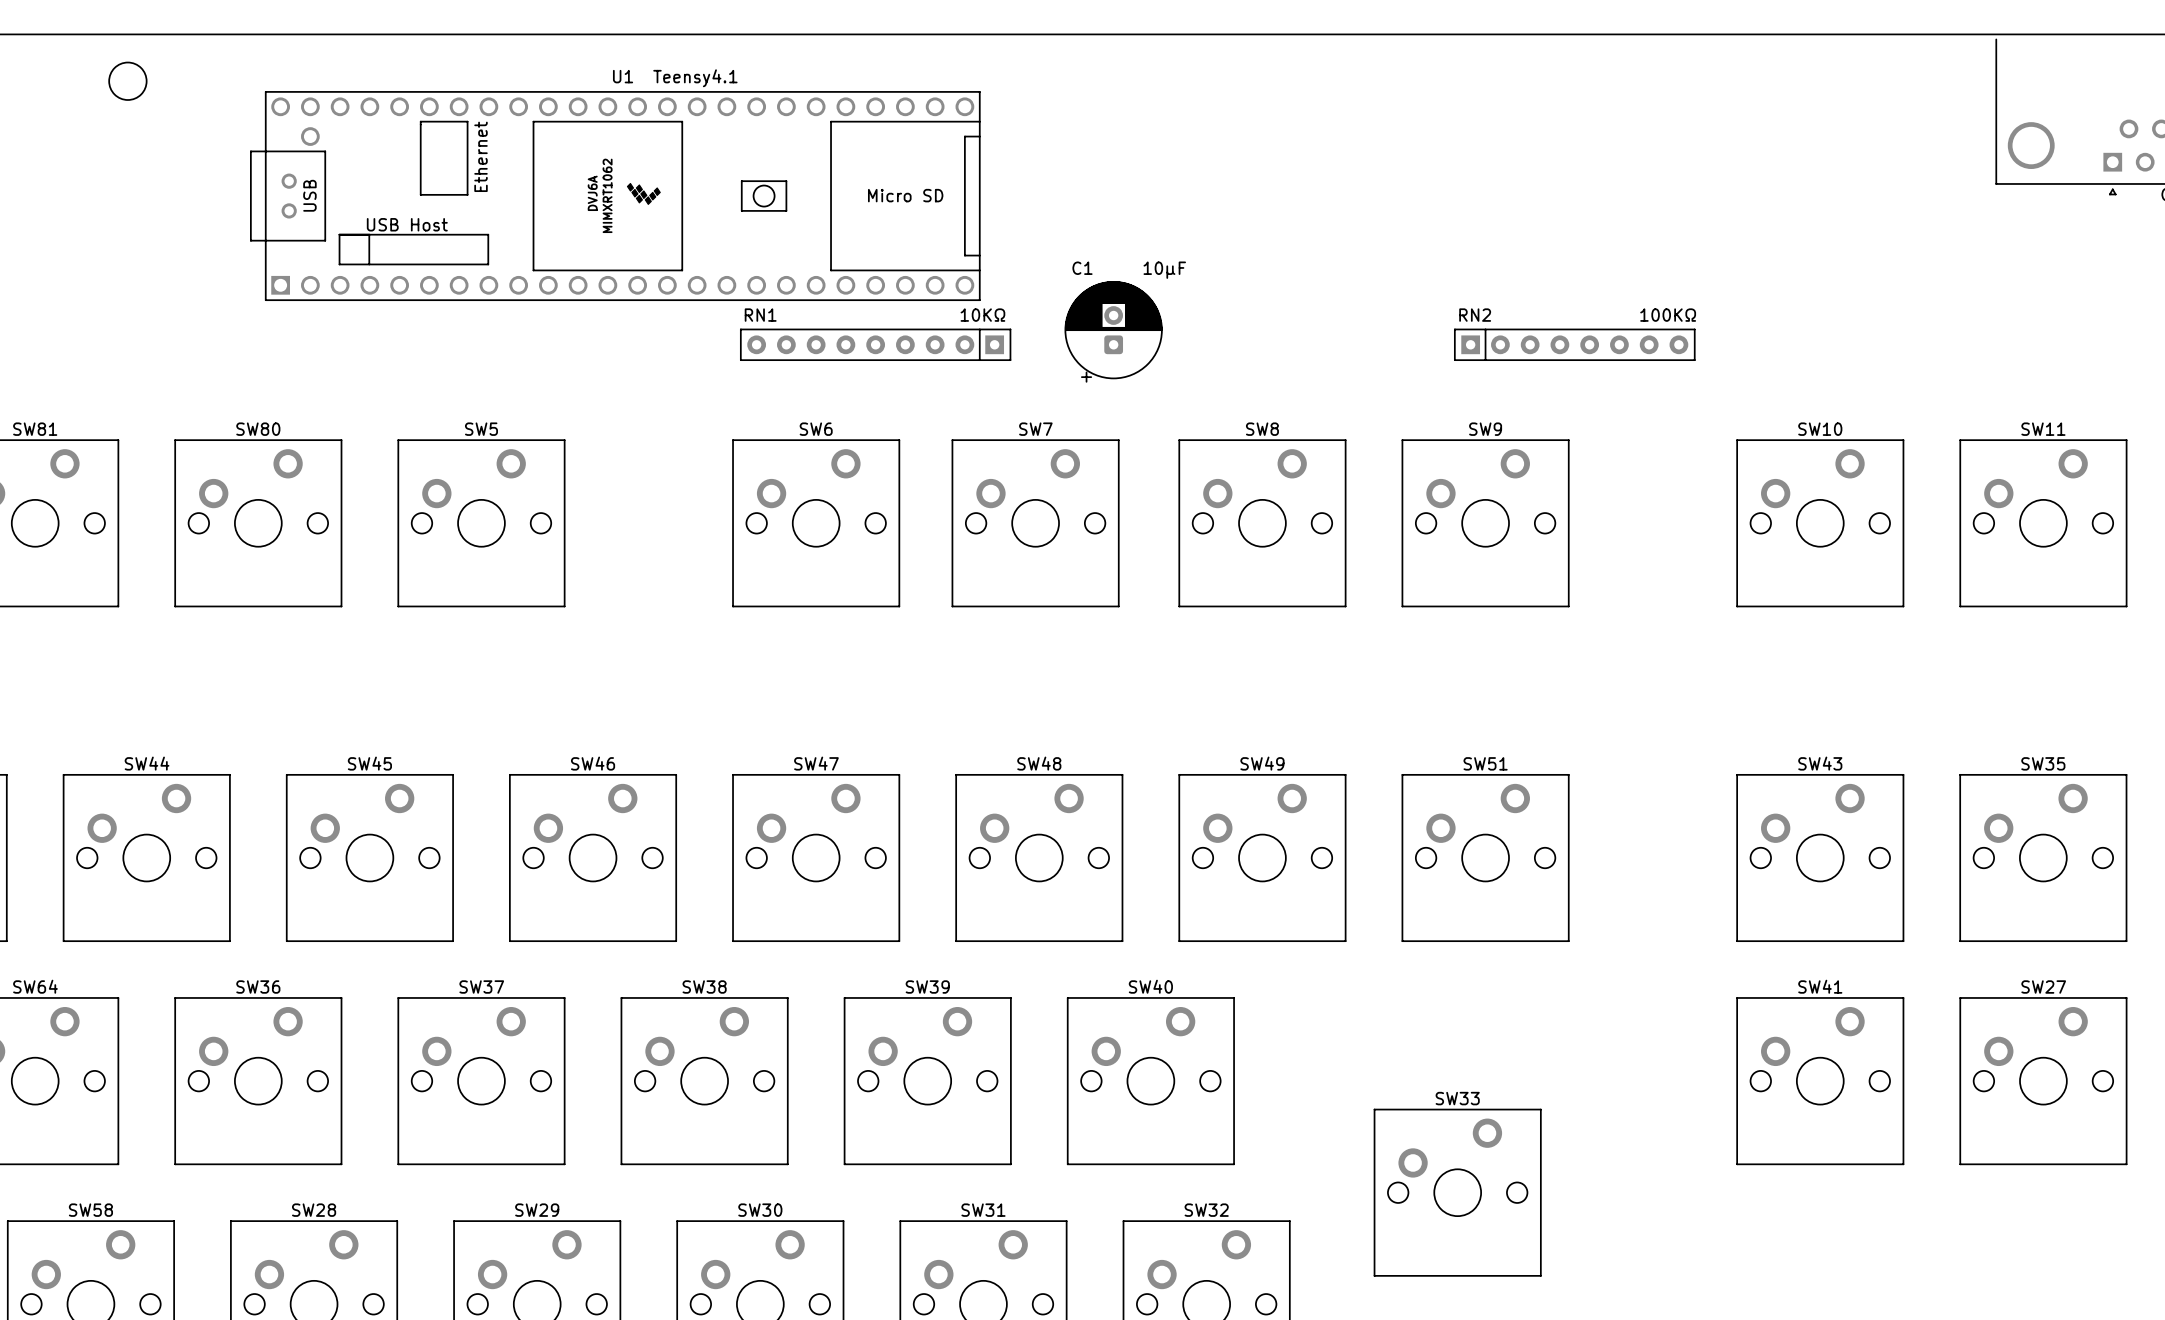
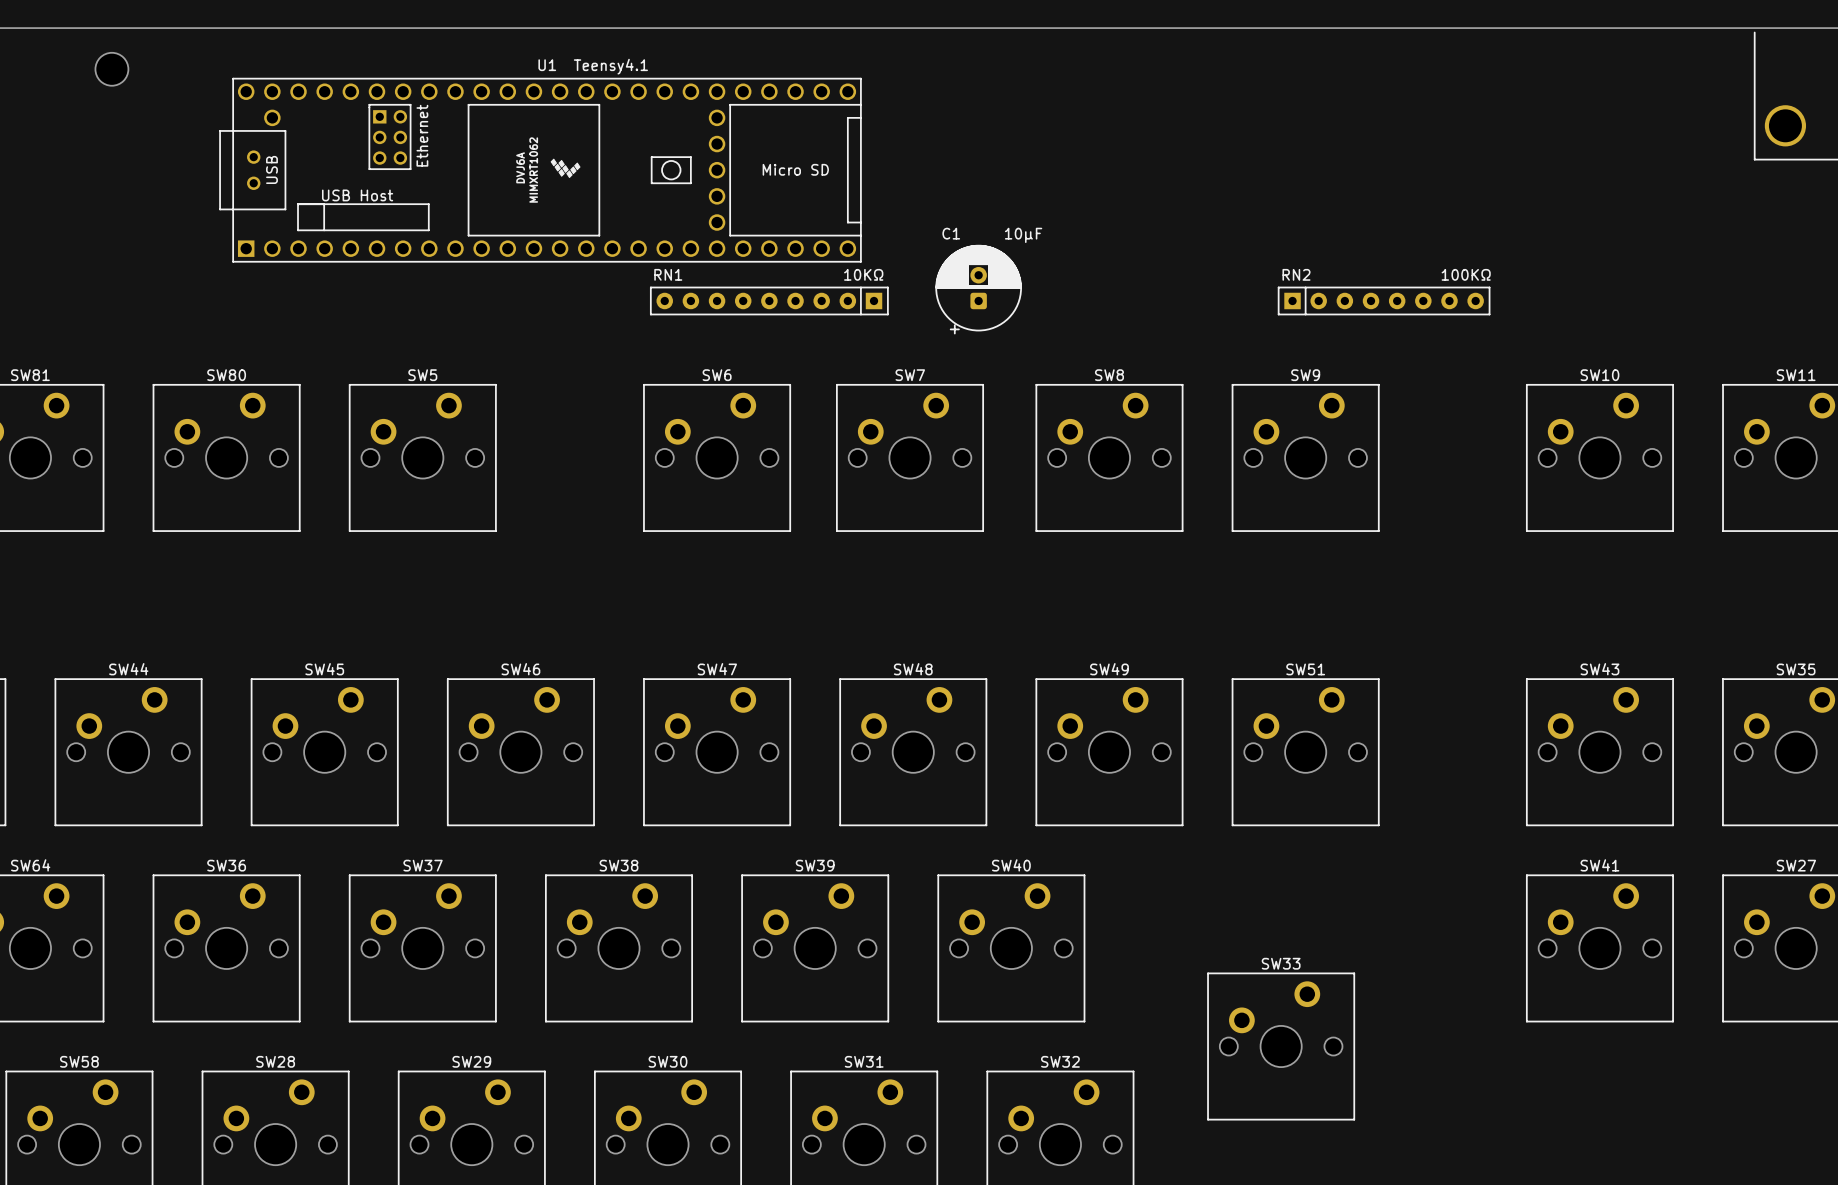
U1 footprint: [250, 91, 981, 302] -> [219, 77, 862, 263]

